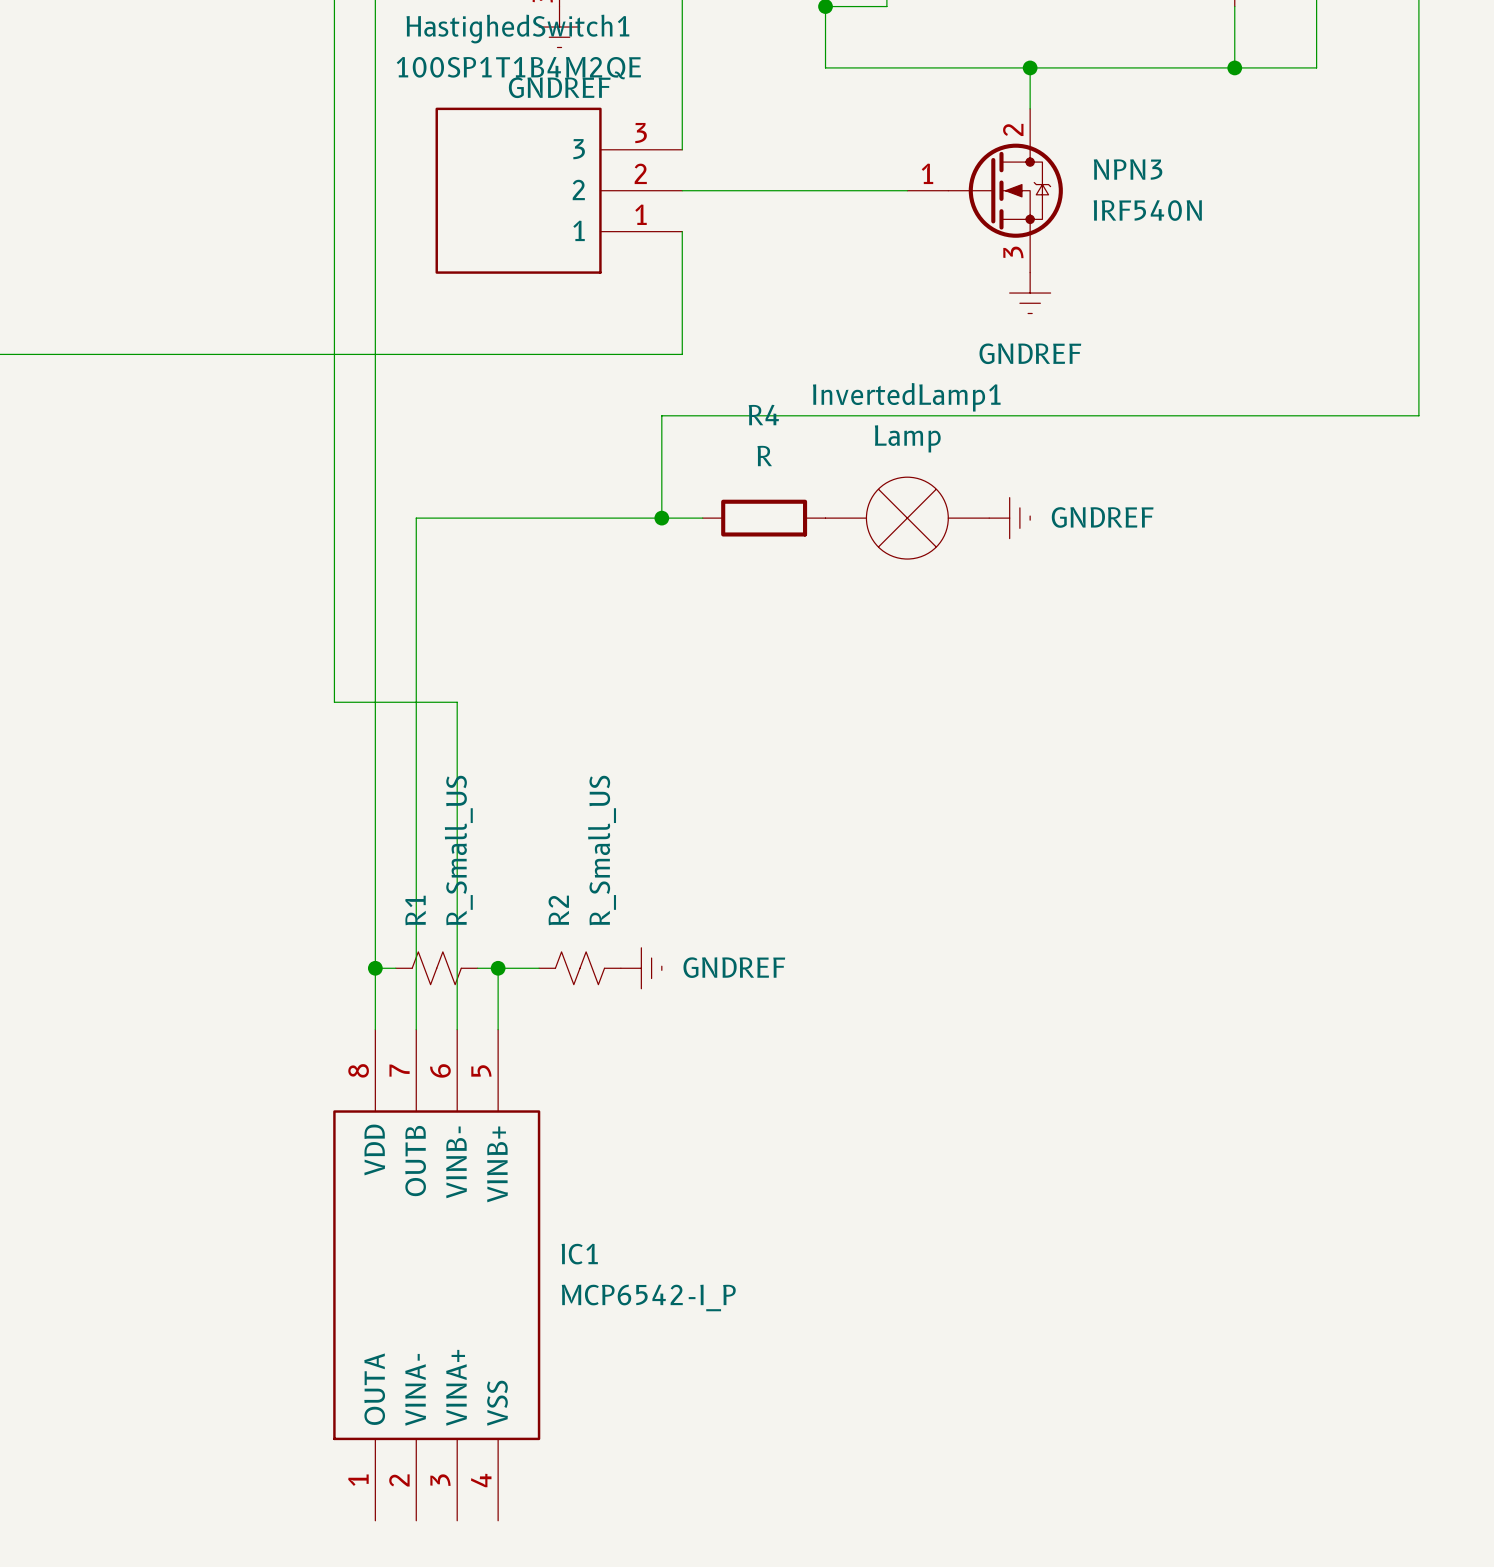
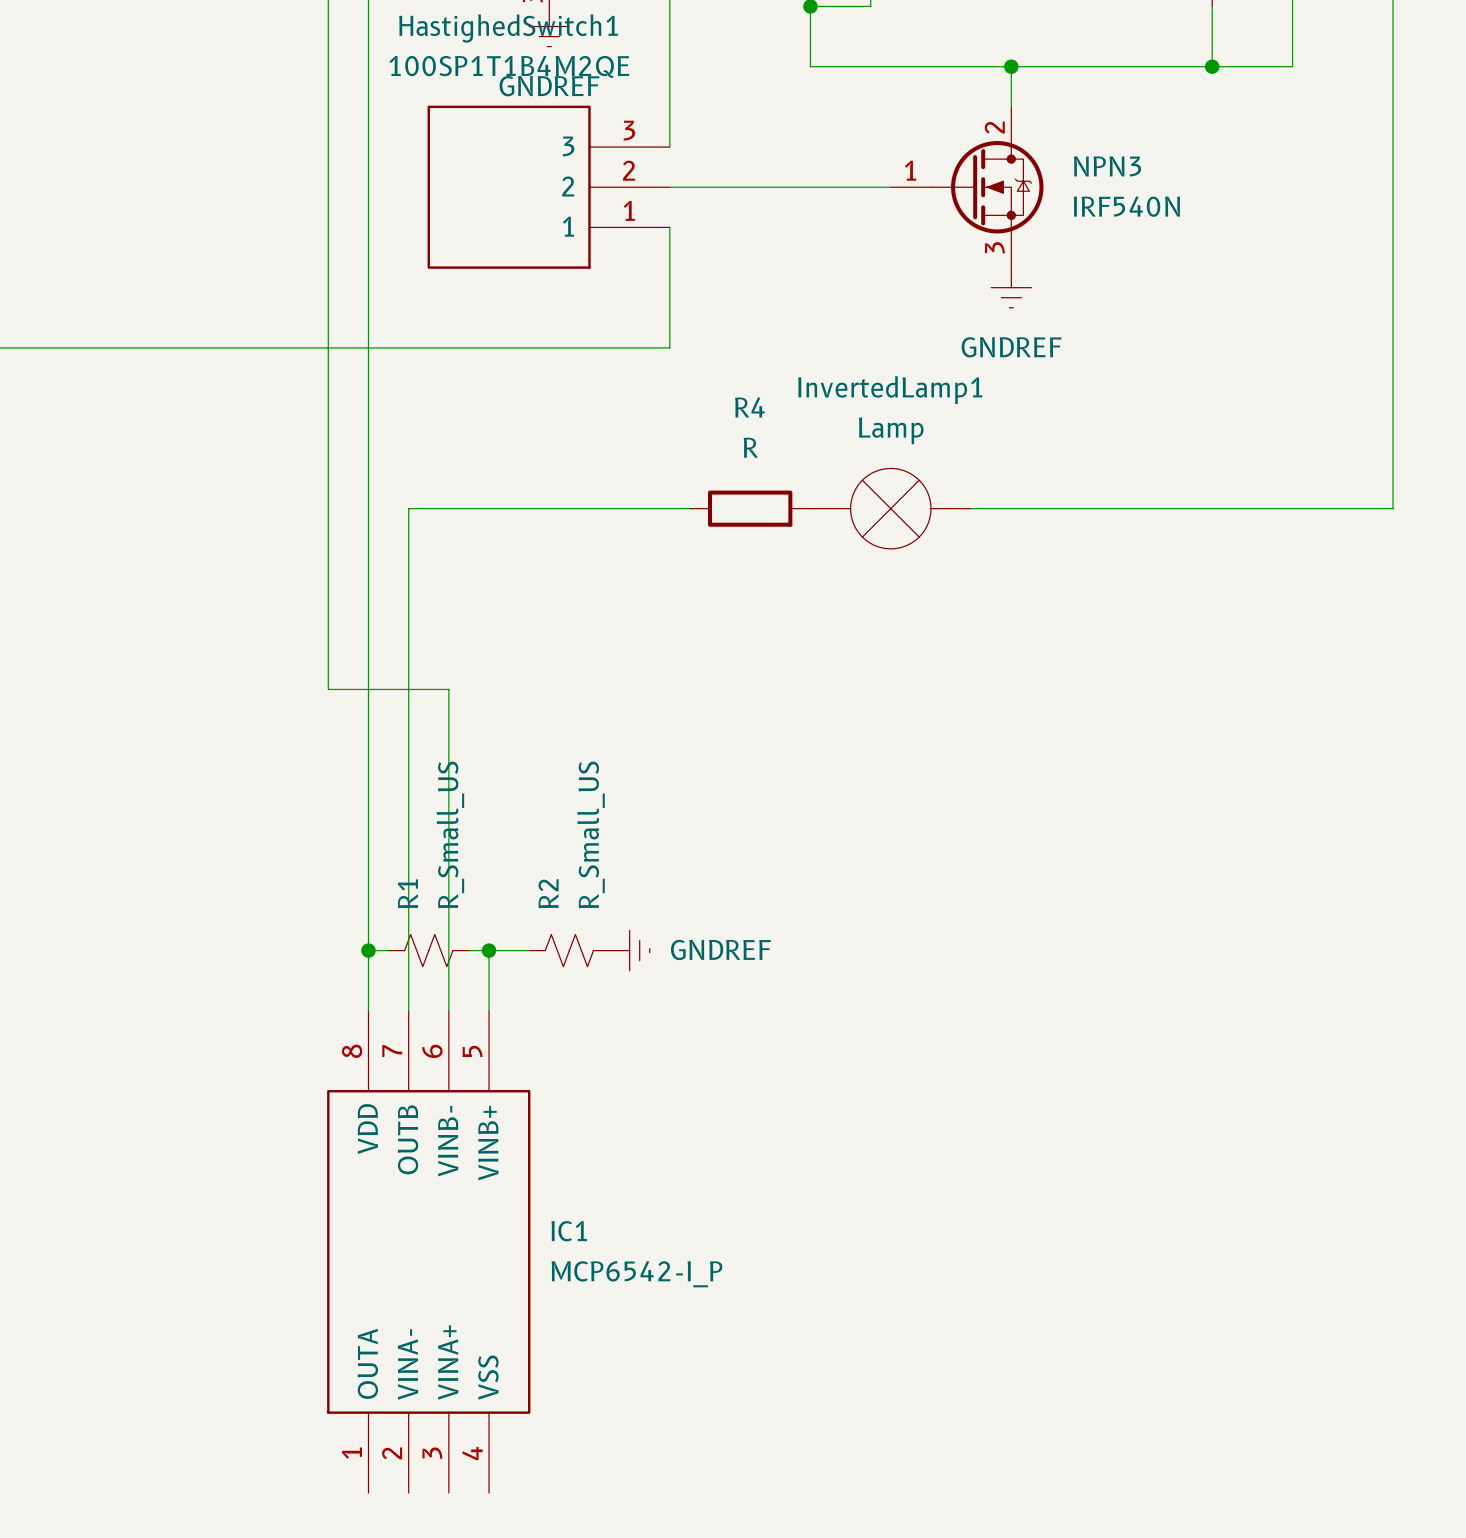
wire: (1418, 415) (661, 415) (661, 518) -> (1393, 408) (1393, 508) (971, 508)
junction: (661, 518) -> none
power symbol: GNDREF (1009, 518) -> none

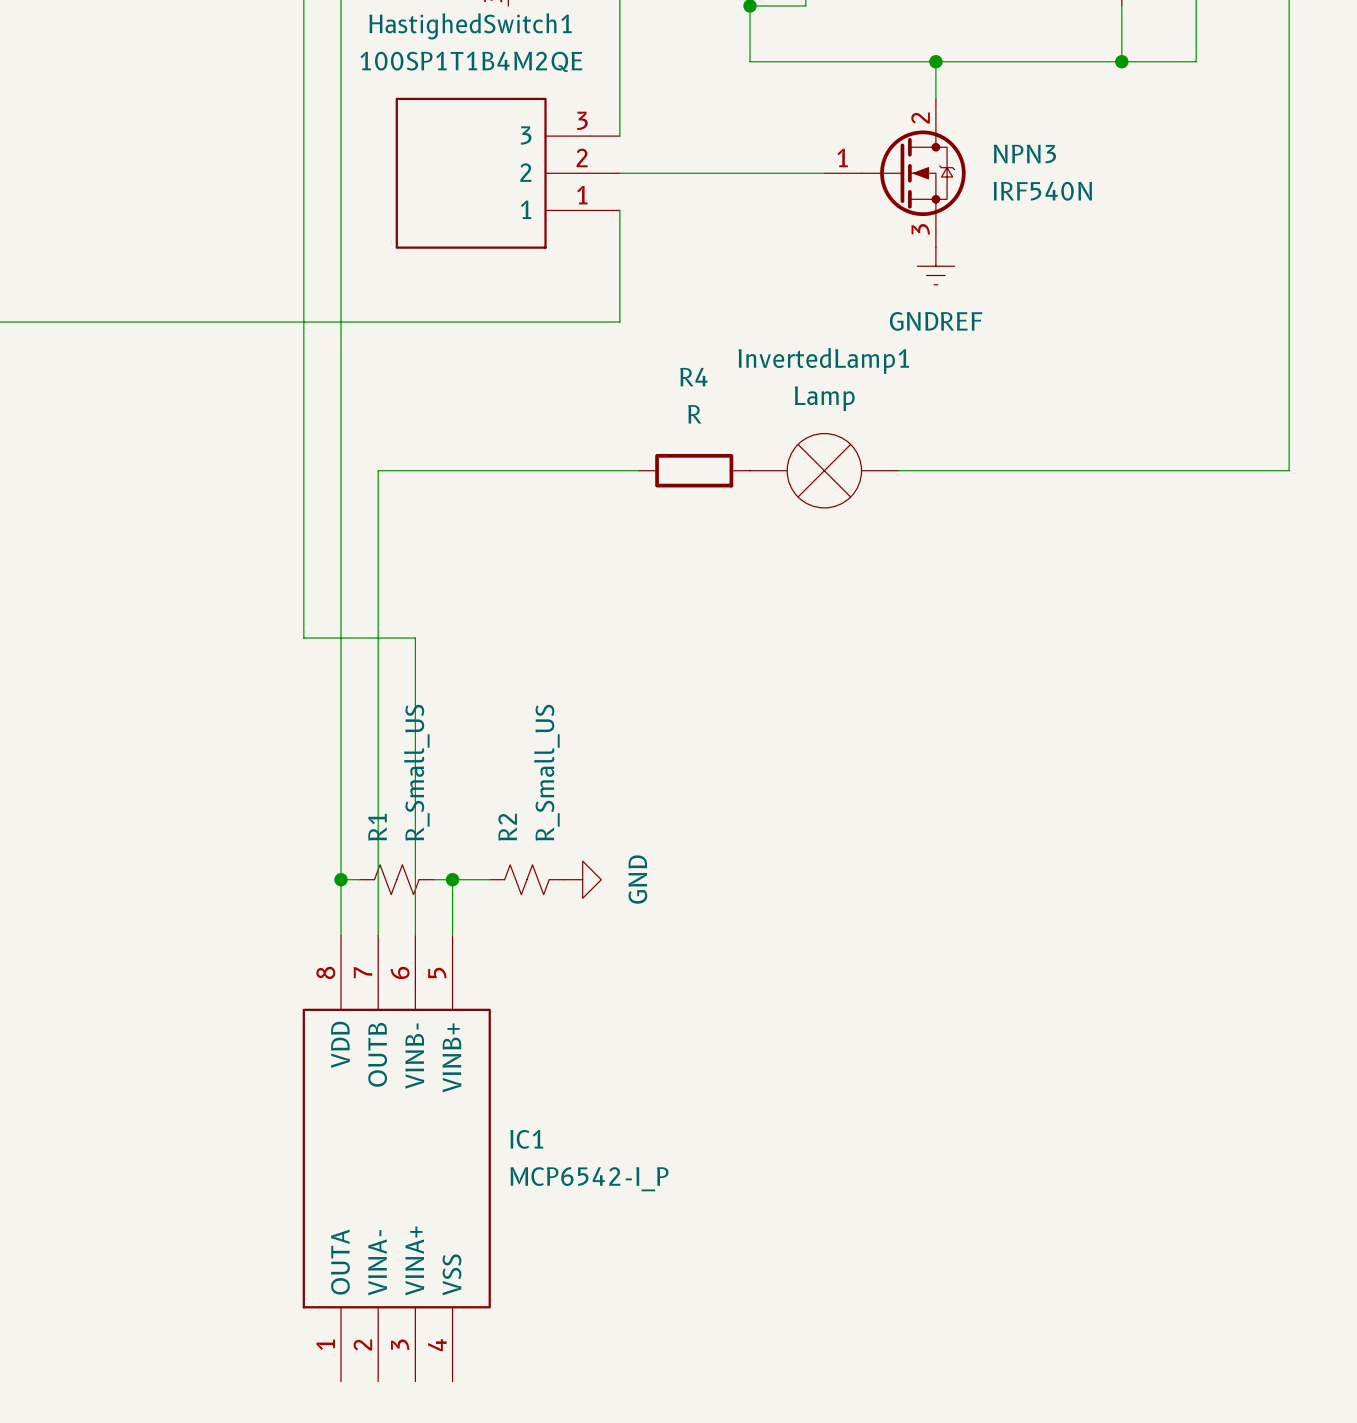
power symbol: GNDREF (549, 26) -> none
power symbol: GNDREF (629, 950) -> GND (582, 879)

